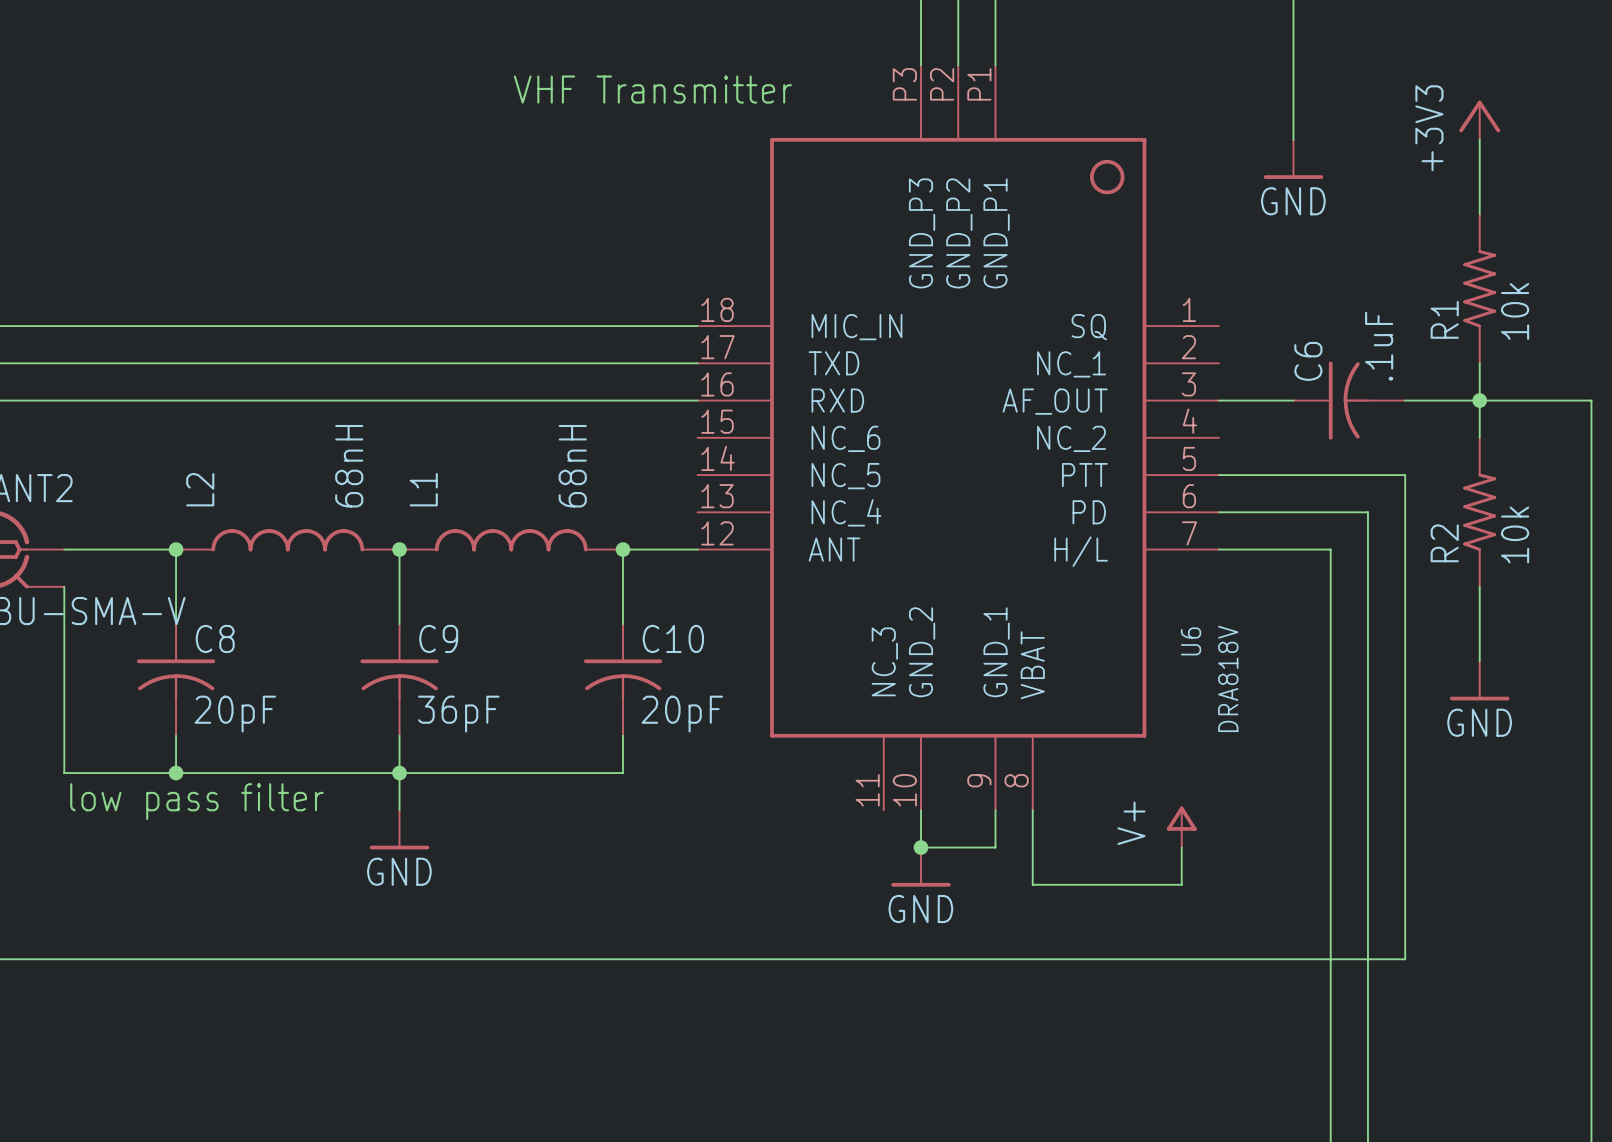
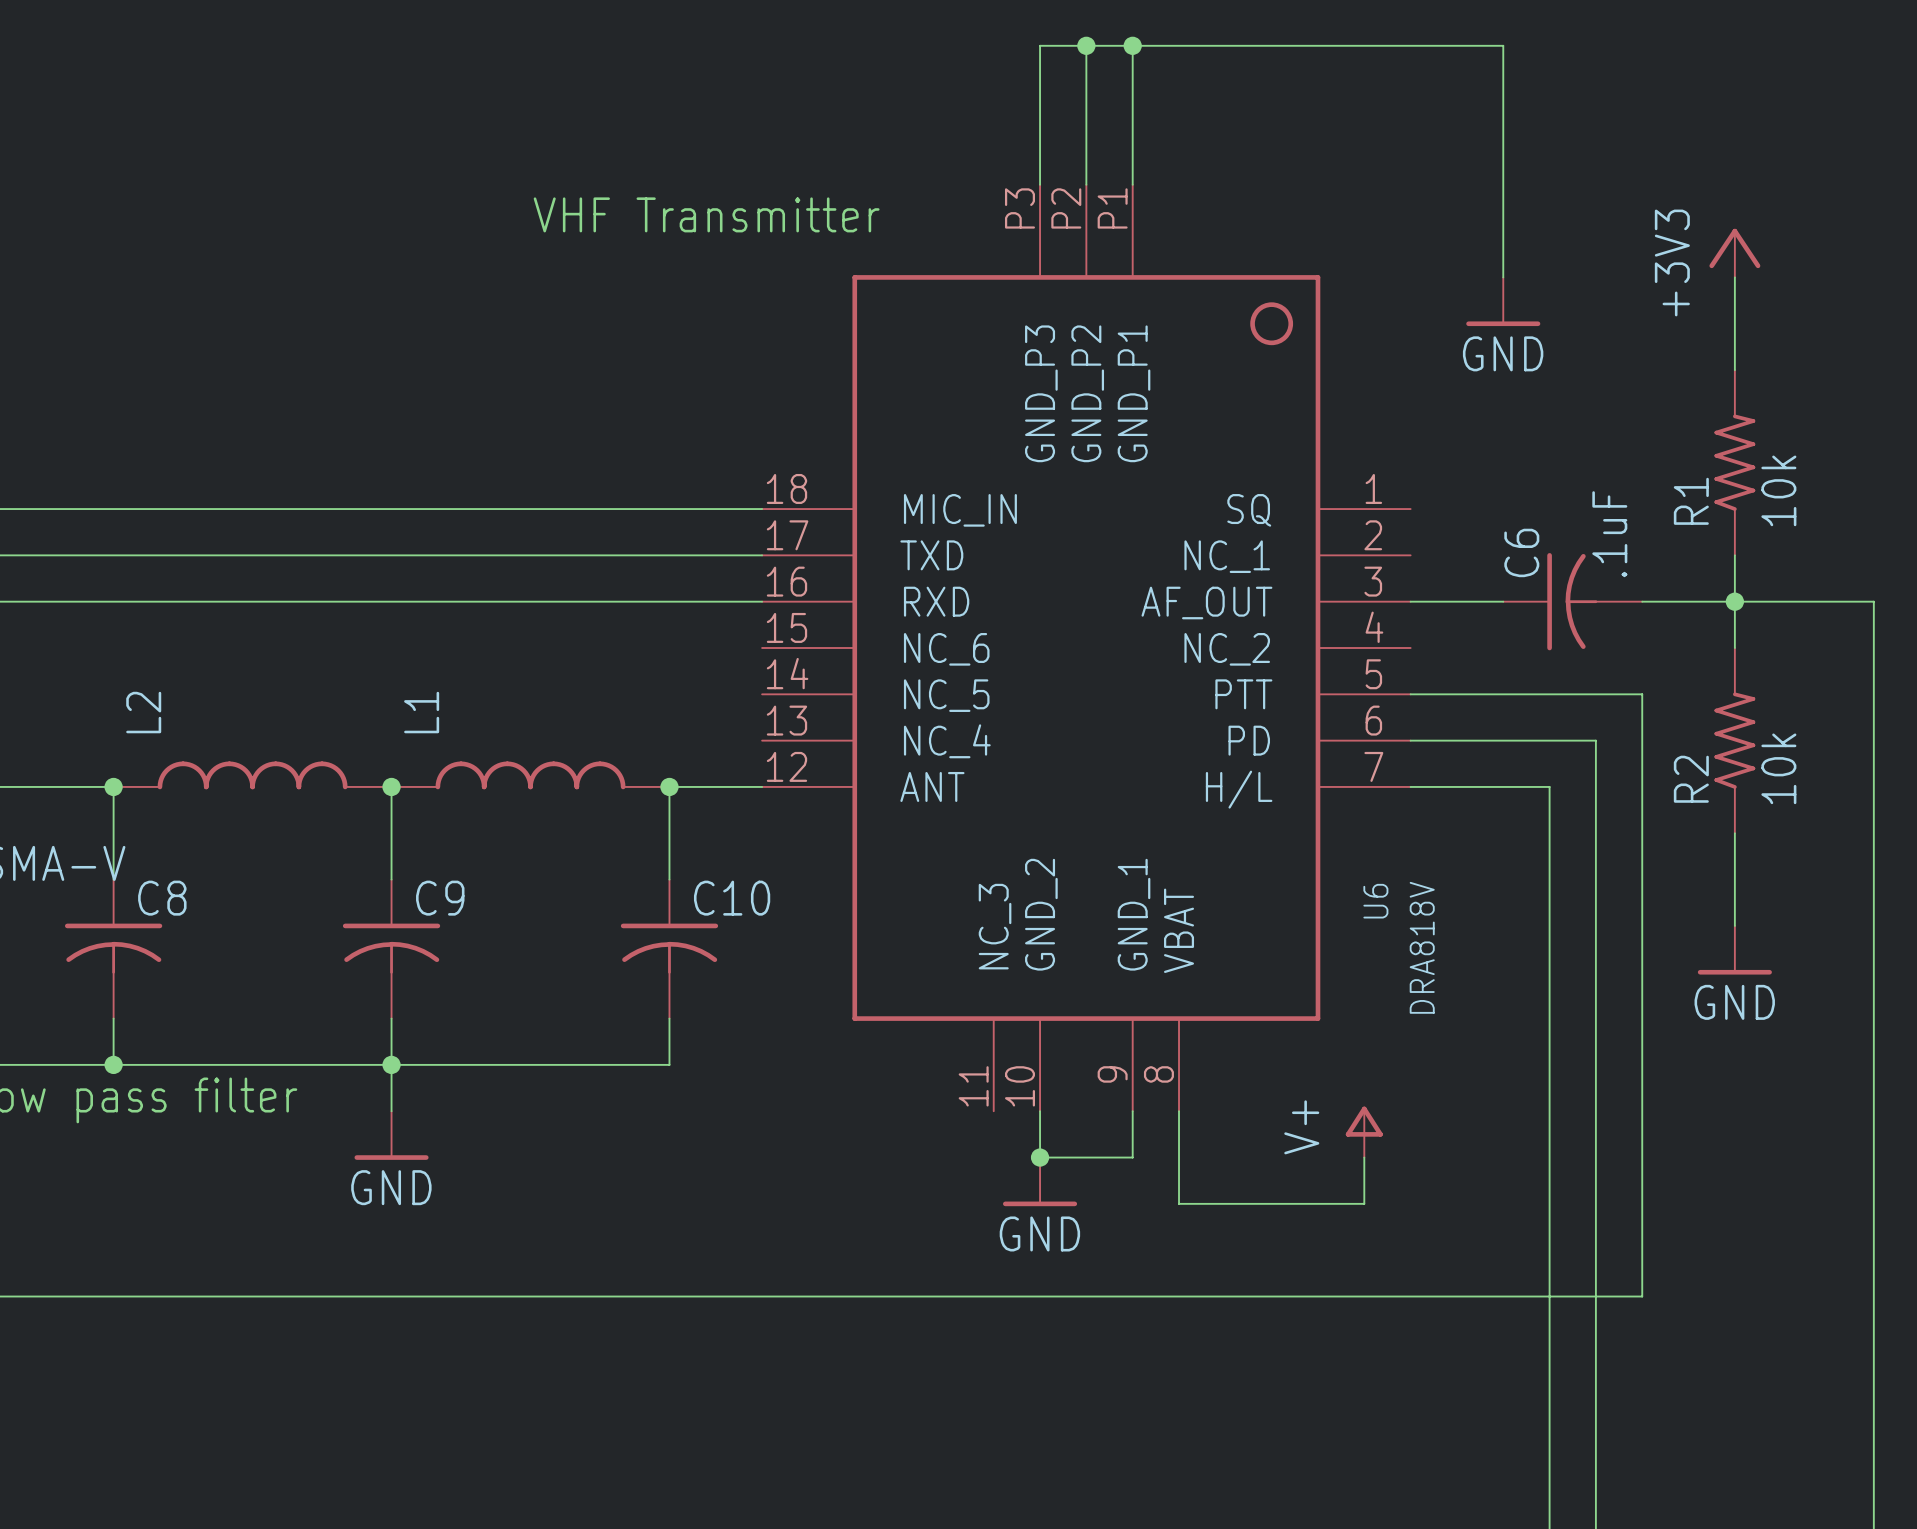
L2 value: 68nH (349, 466) -> none
L1 value: 68nH (572, 466) -> none
C8 value: 20pF (235, 714) -> none
C9 value: 36pF (458, 714) -> none
C10 value: 20pF (682, 714) -> none

